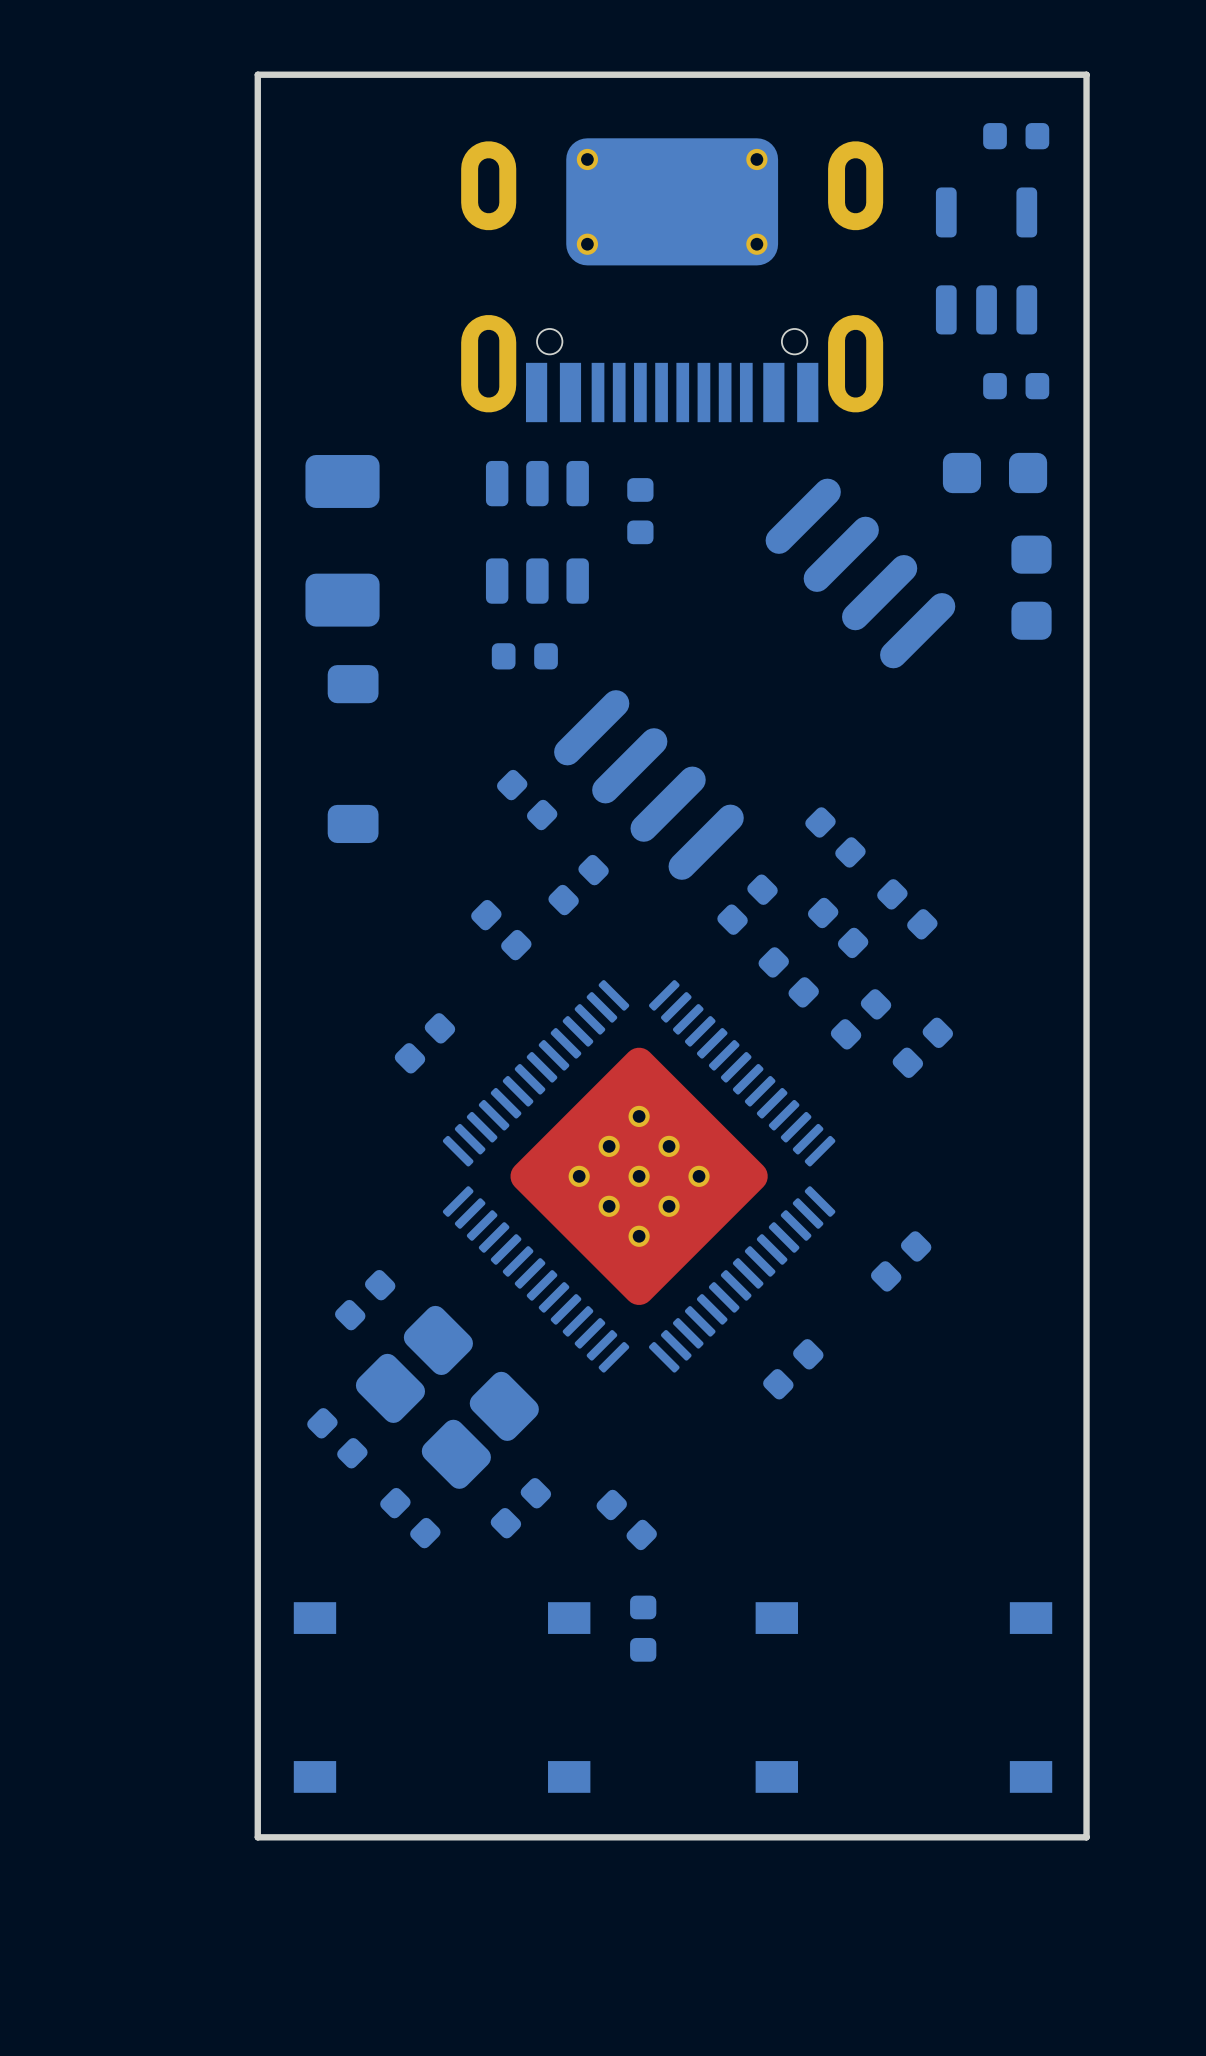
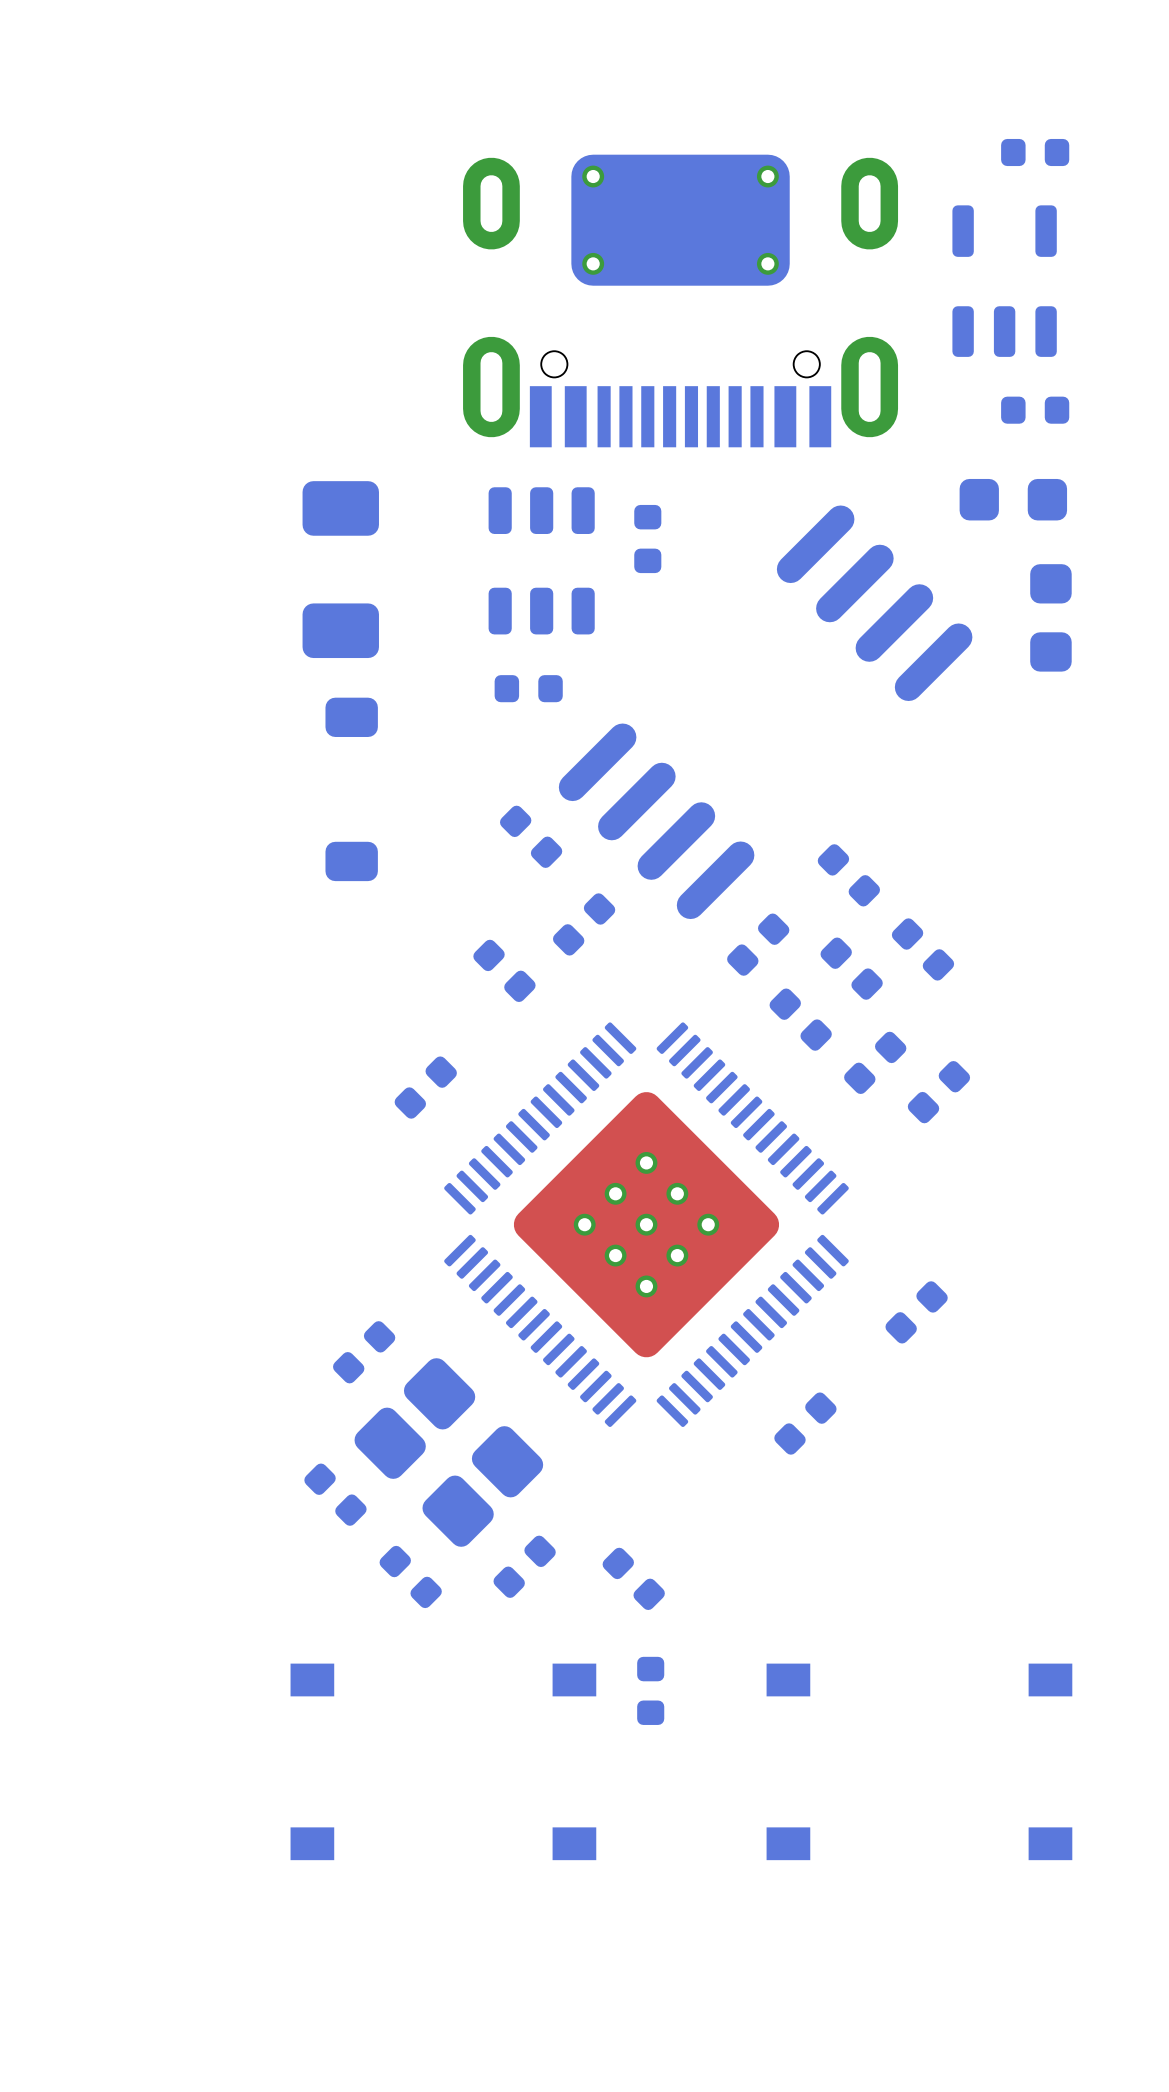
board edge: (257, 74) (1086, 74) (1086, 1837) (257, 1837) (257, 74) -> none

